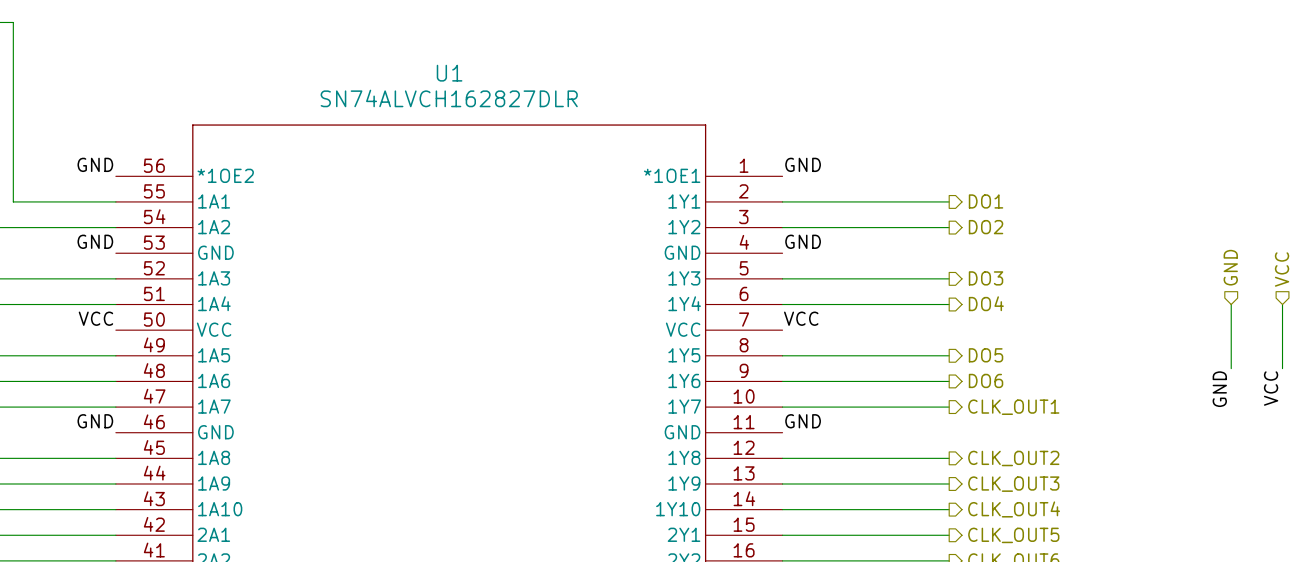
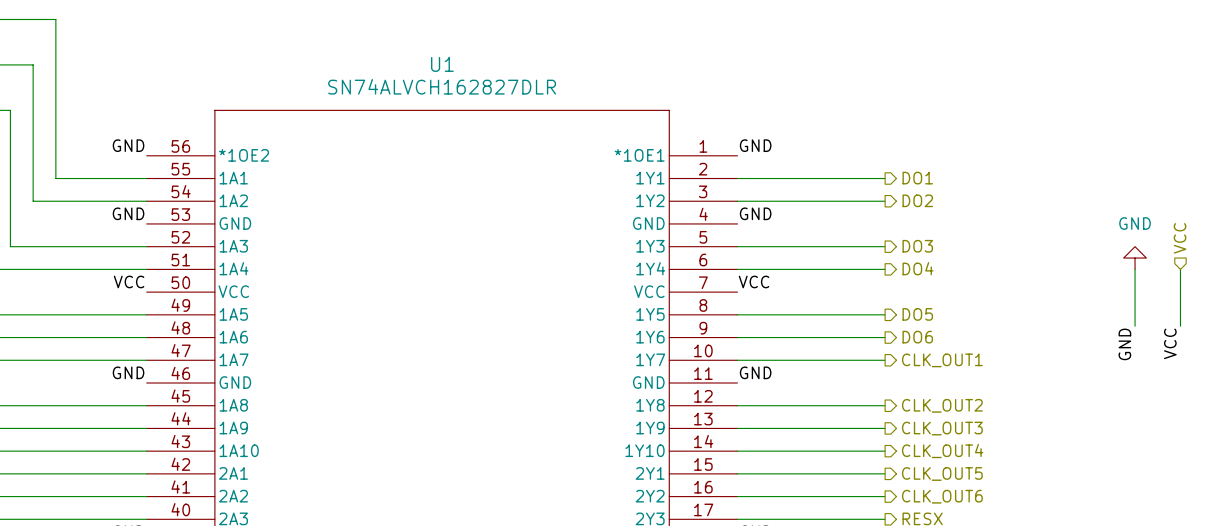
hierarchical label: GND (1230, 267) -> none
power symbol: none -> GND (1135, 258)

